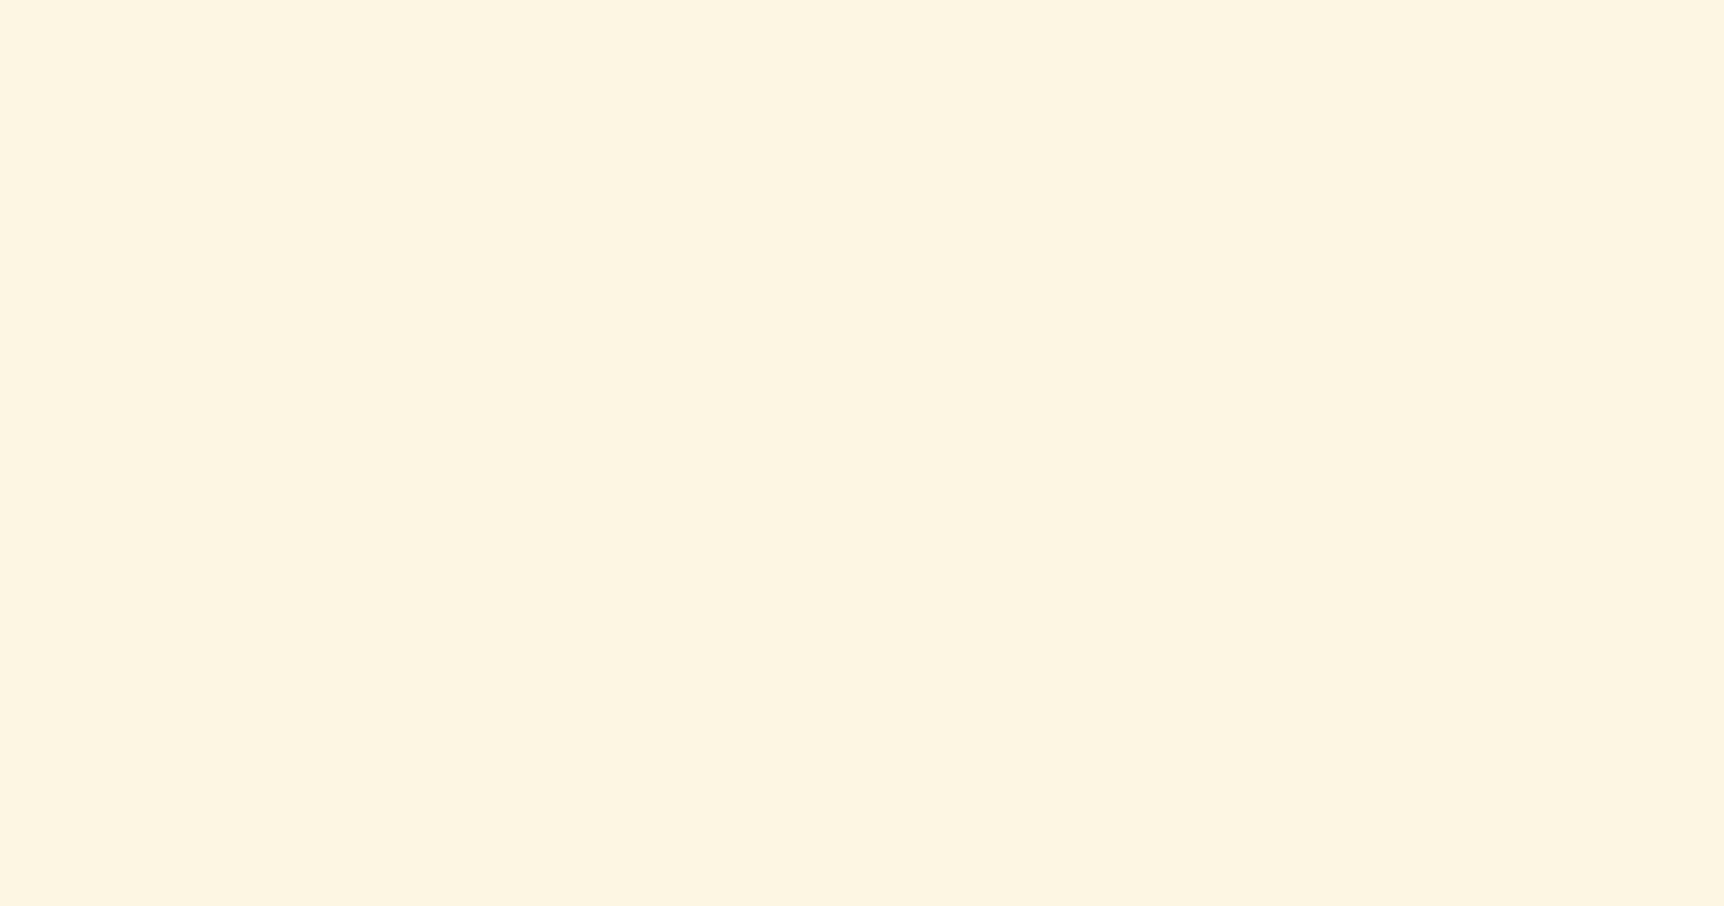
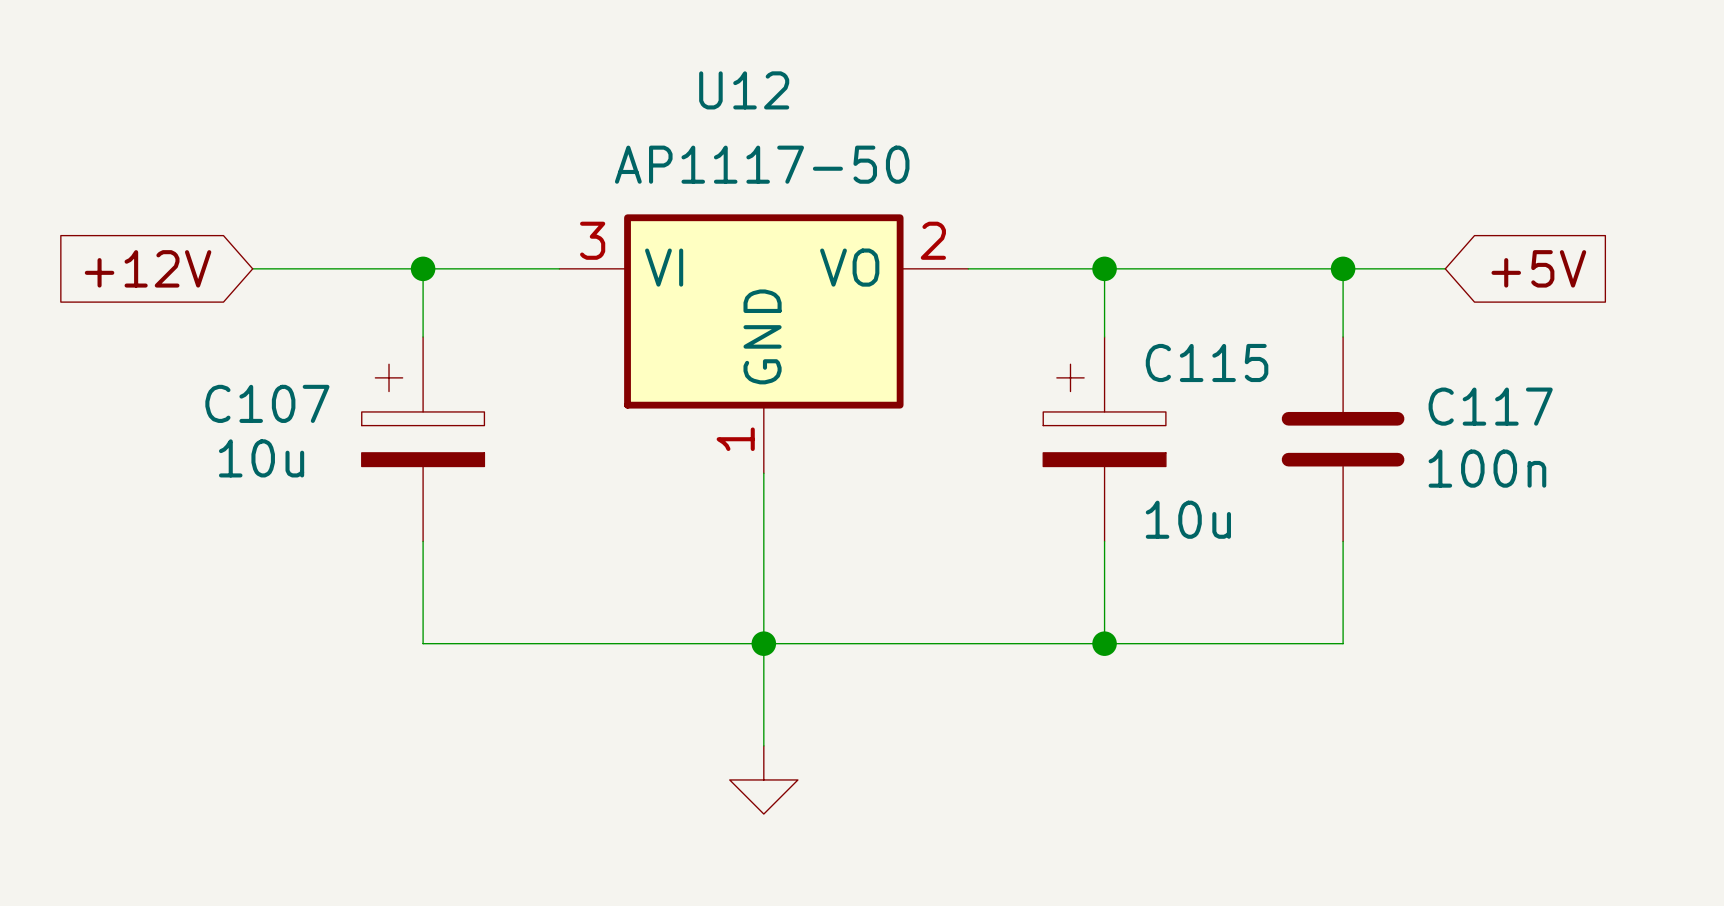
global label: none -> +12V (148, 268)
wire: none -> (252, 268) (559, 268)
wire: none -> (423, 268) (423, 337)
junction: none -> (423, 268)
wire: none -> (968, 268) (1445, 268)
wire: none -> (1104, 268) (1104, 337)
junction: none -> (1104, 268)
wire: none -> (1343, 268) (1343, 337)
junction: none -> (1343, 268)
global label: none -> +5V (1538, 268)
U12: none -> AP1117-50 (763, 343)
C107: none -> 10u (423, 439)
C115: none -> 10u (1104, 439)
C117: none -> 100n (1343, 439)
wire: none -> (763, 473) (763, 745)
wire: none -> (423, 541) (423, 643) (1343, 643) (1343, 541)
wire: none -> (1104, 541) (1104, 643)
junction: none -> (763, 643)
junction: none -> (1104, 643)
power symbol: none -> (763, 779)

